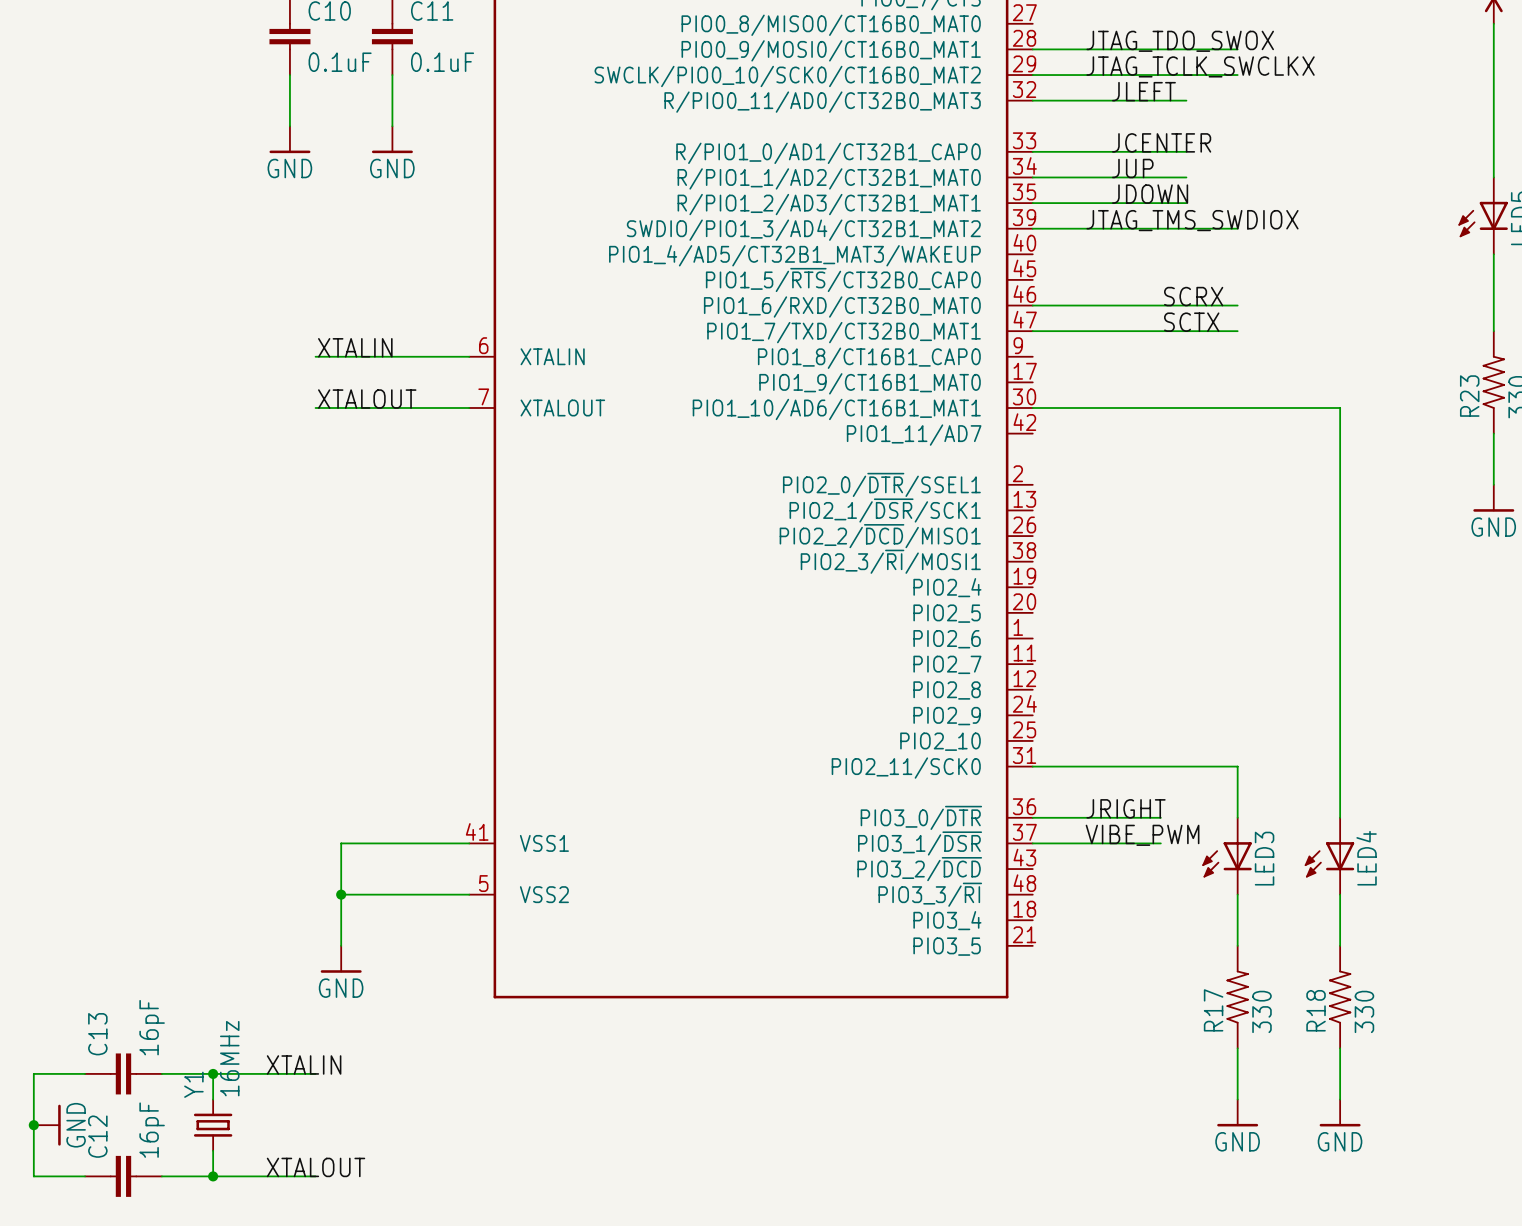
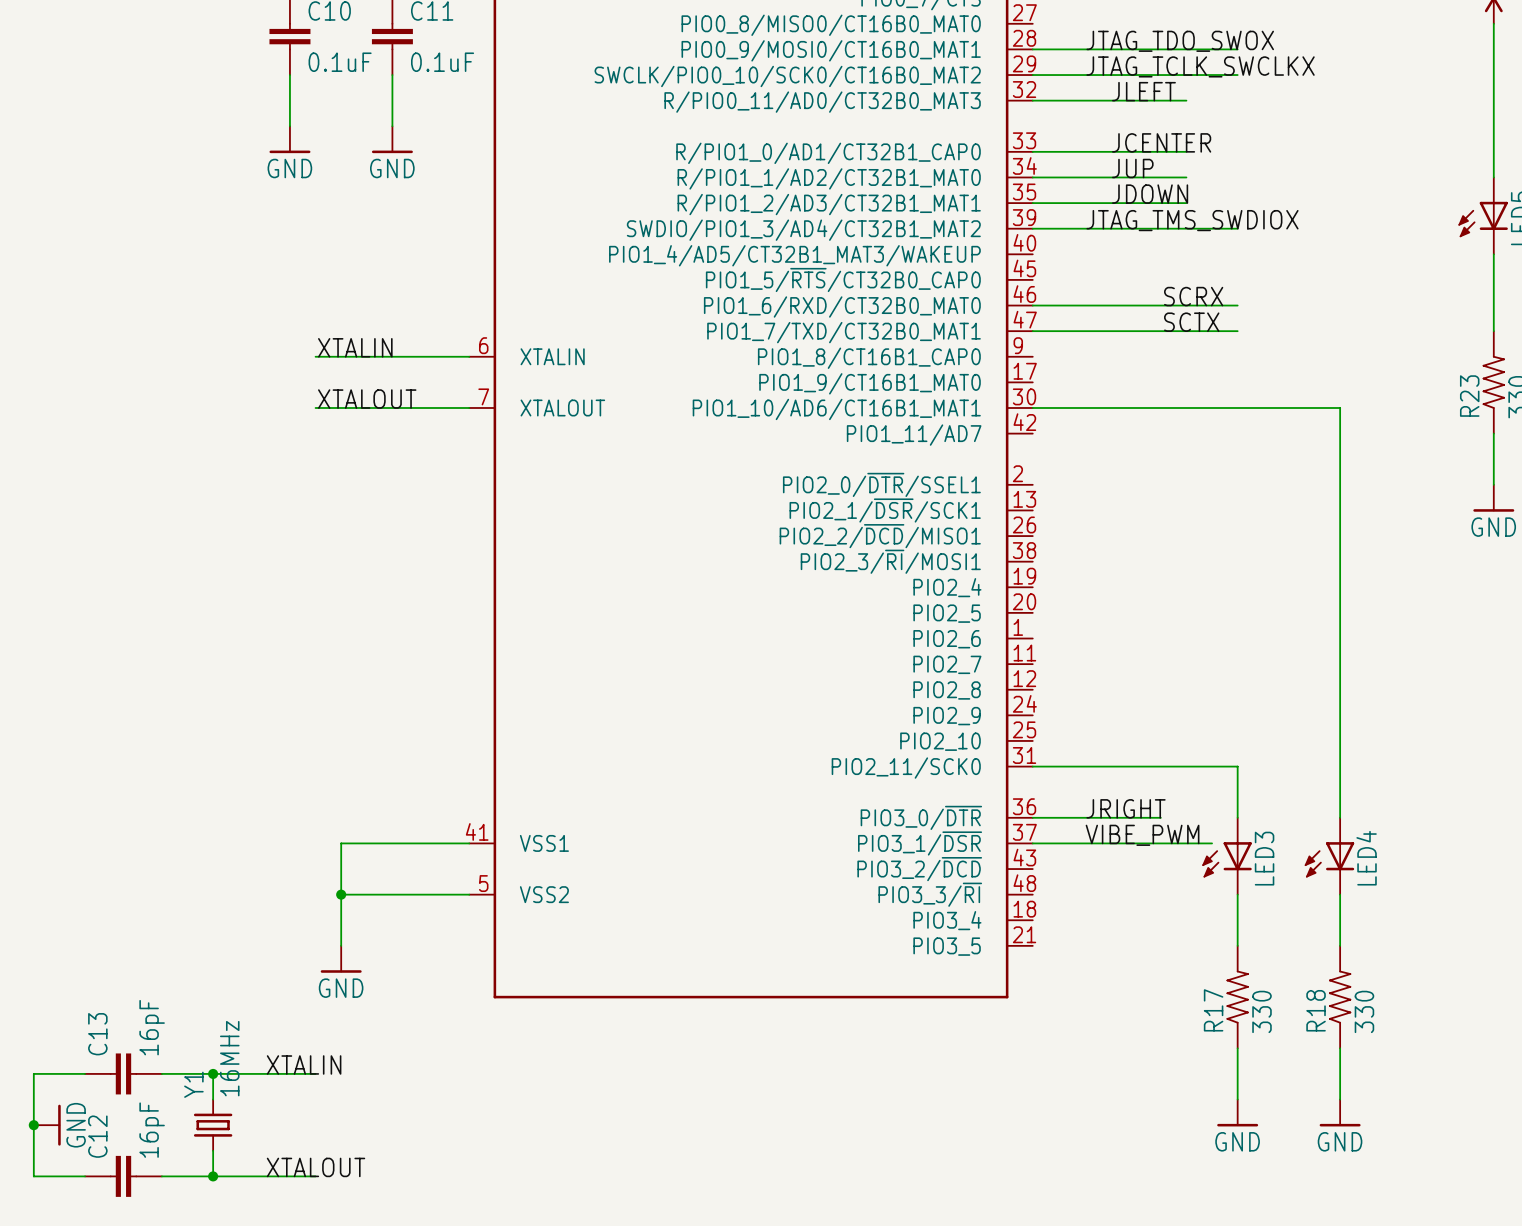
wire: none -> (1160, 843) (1212, 843)

